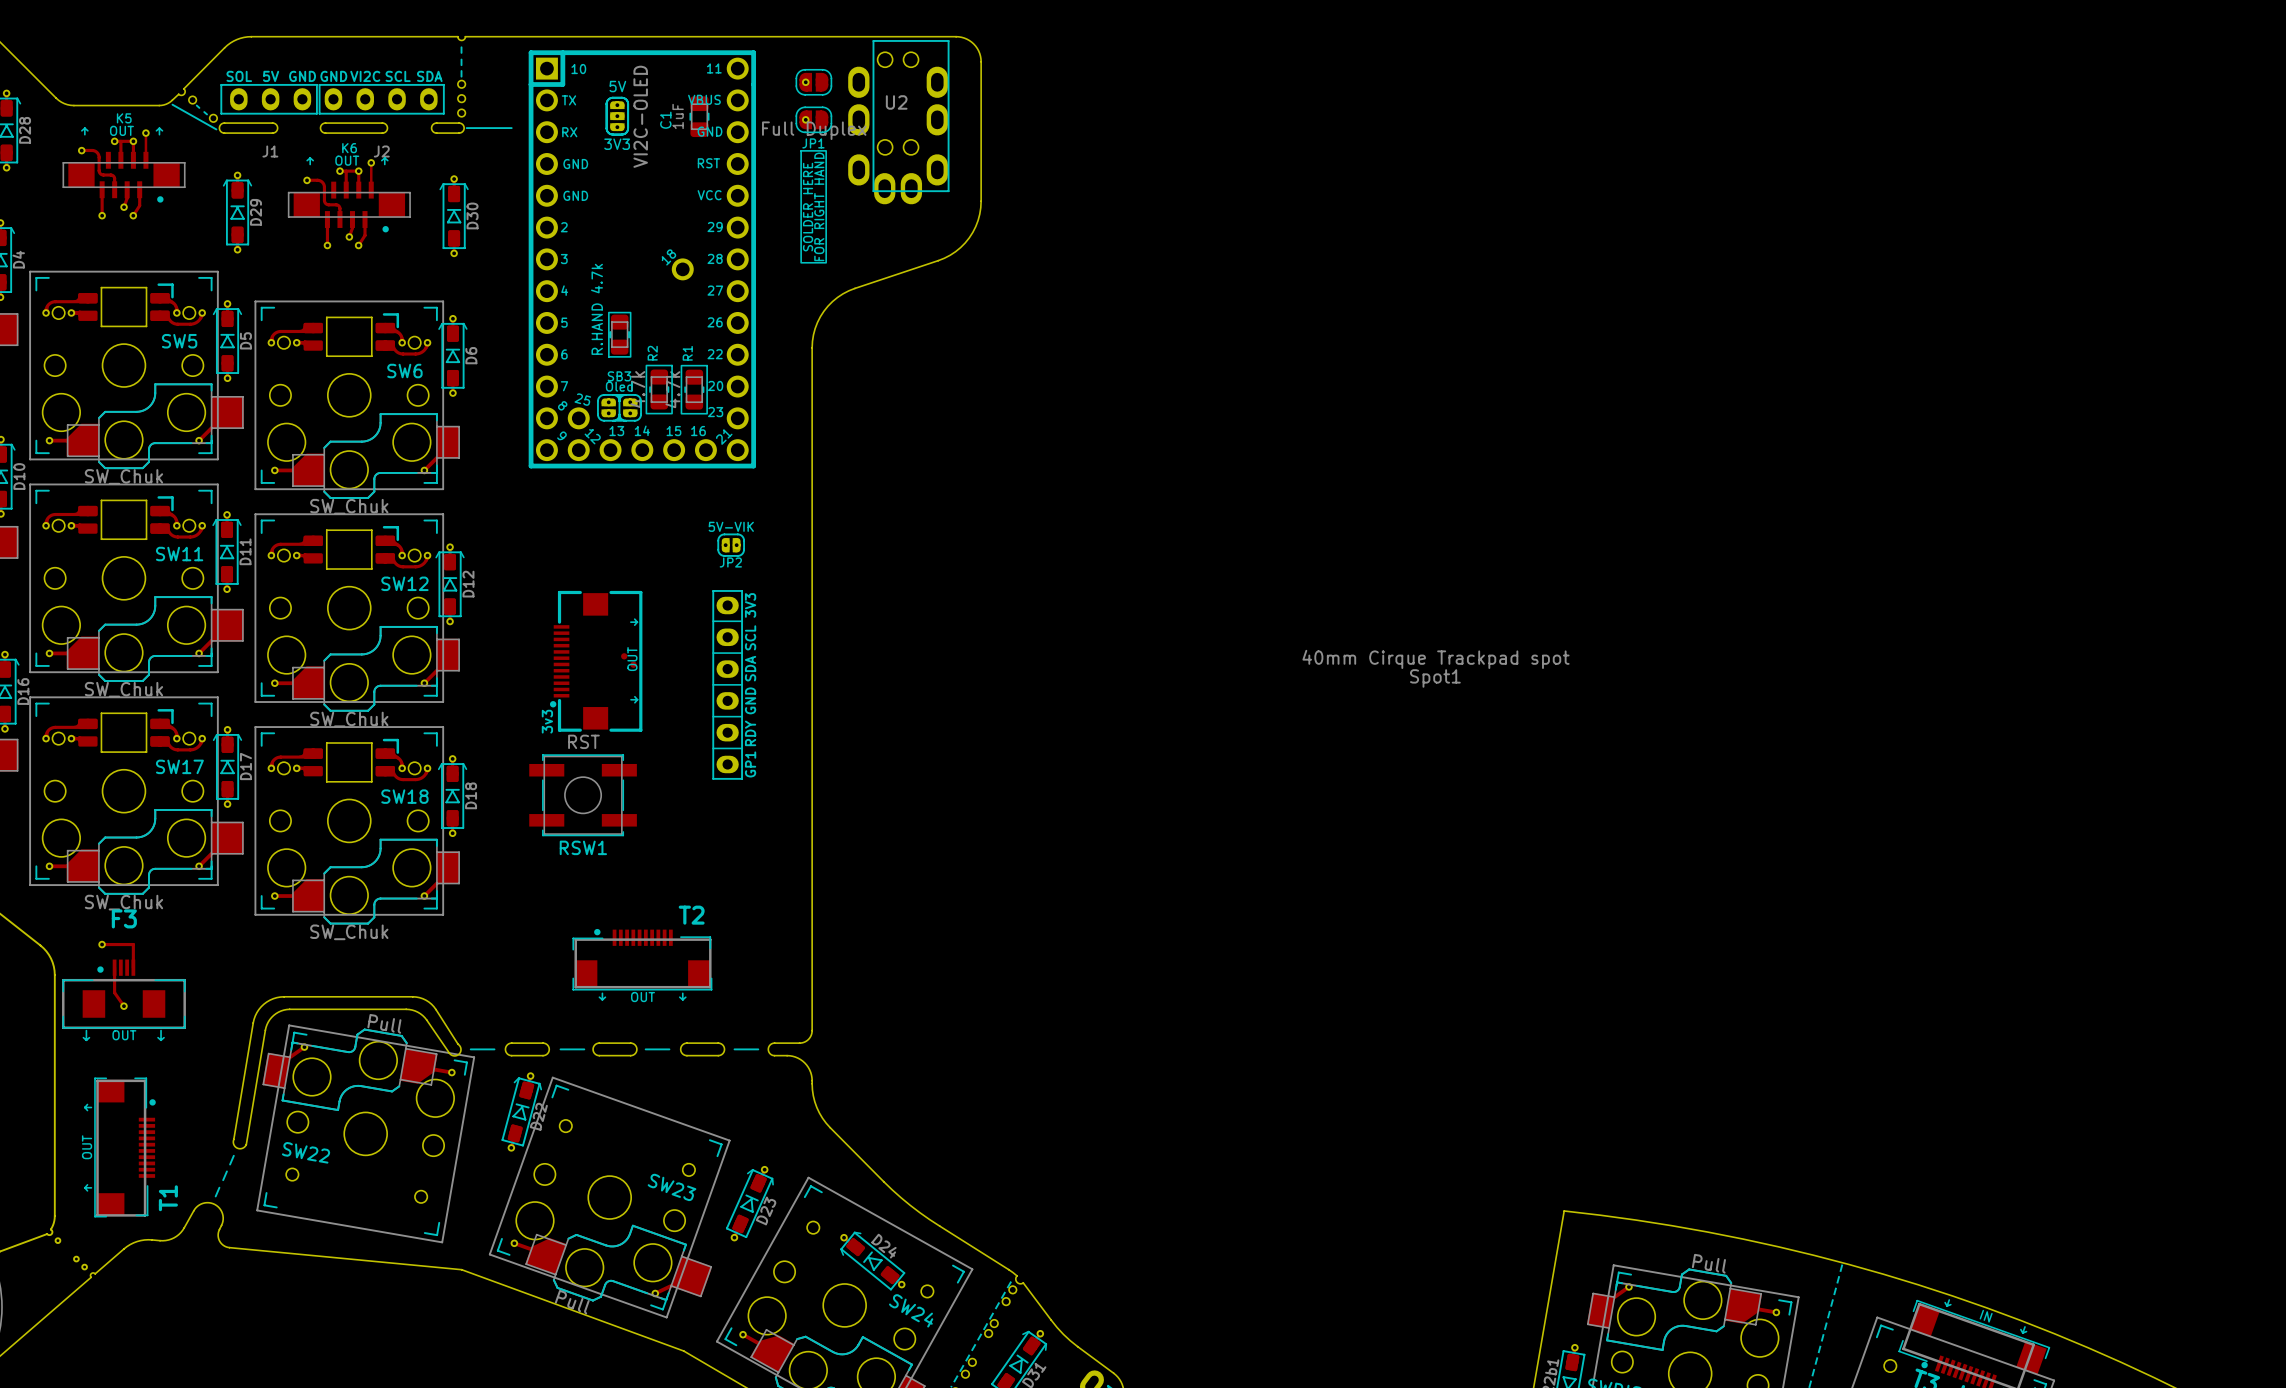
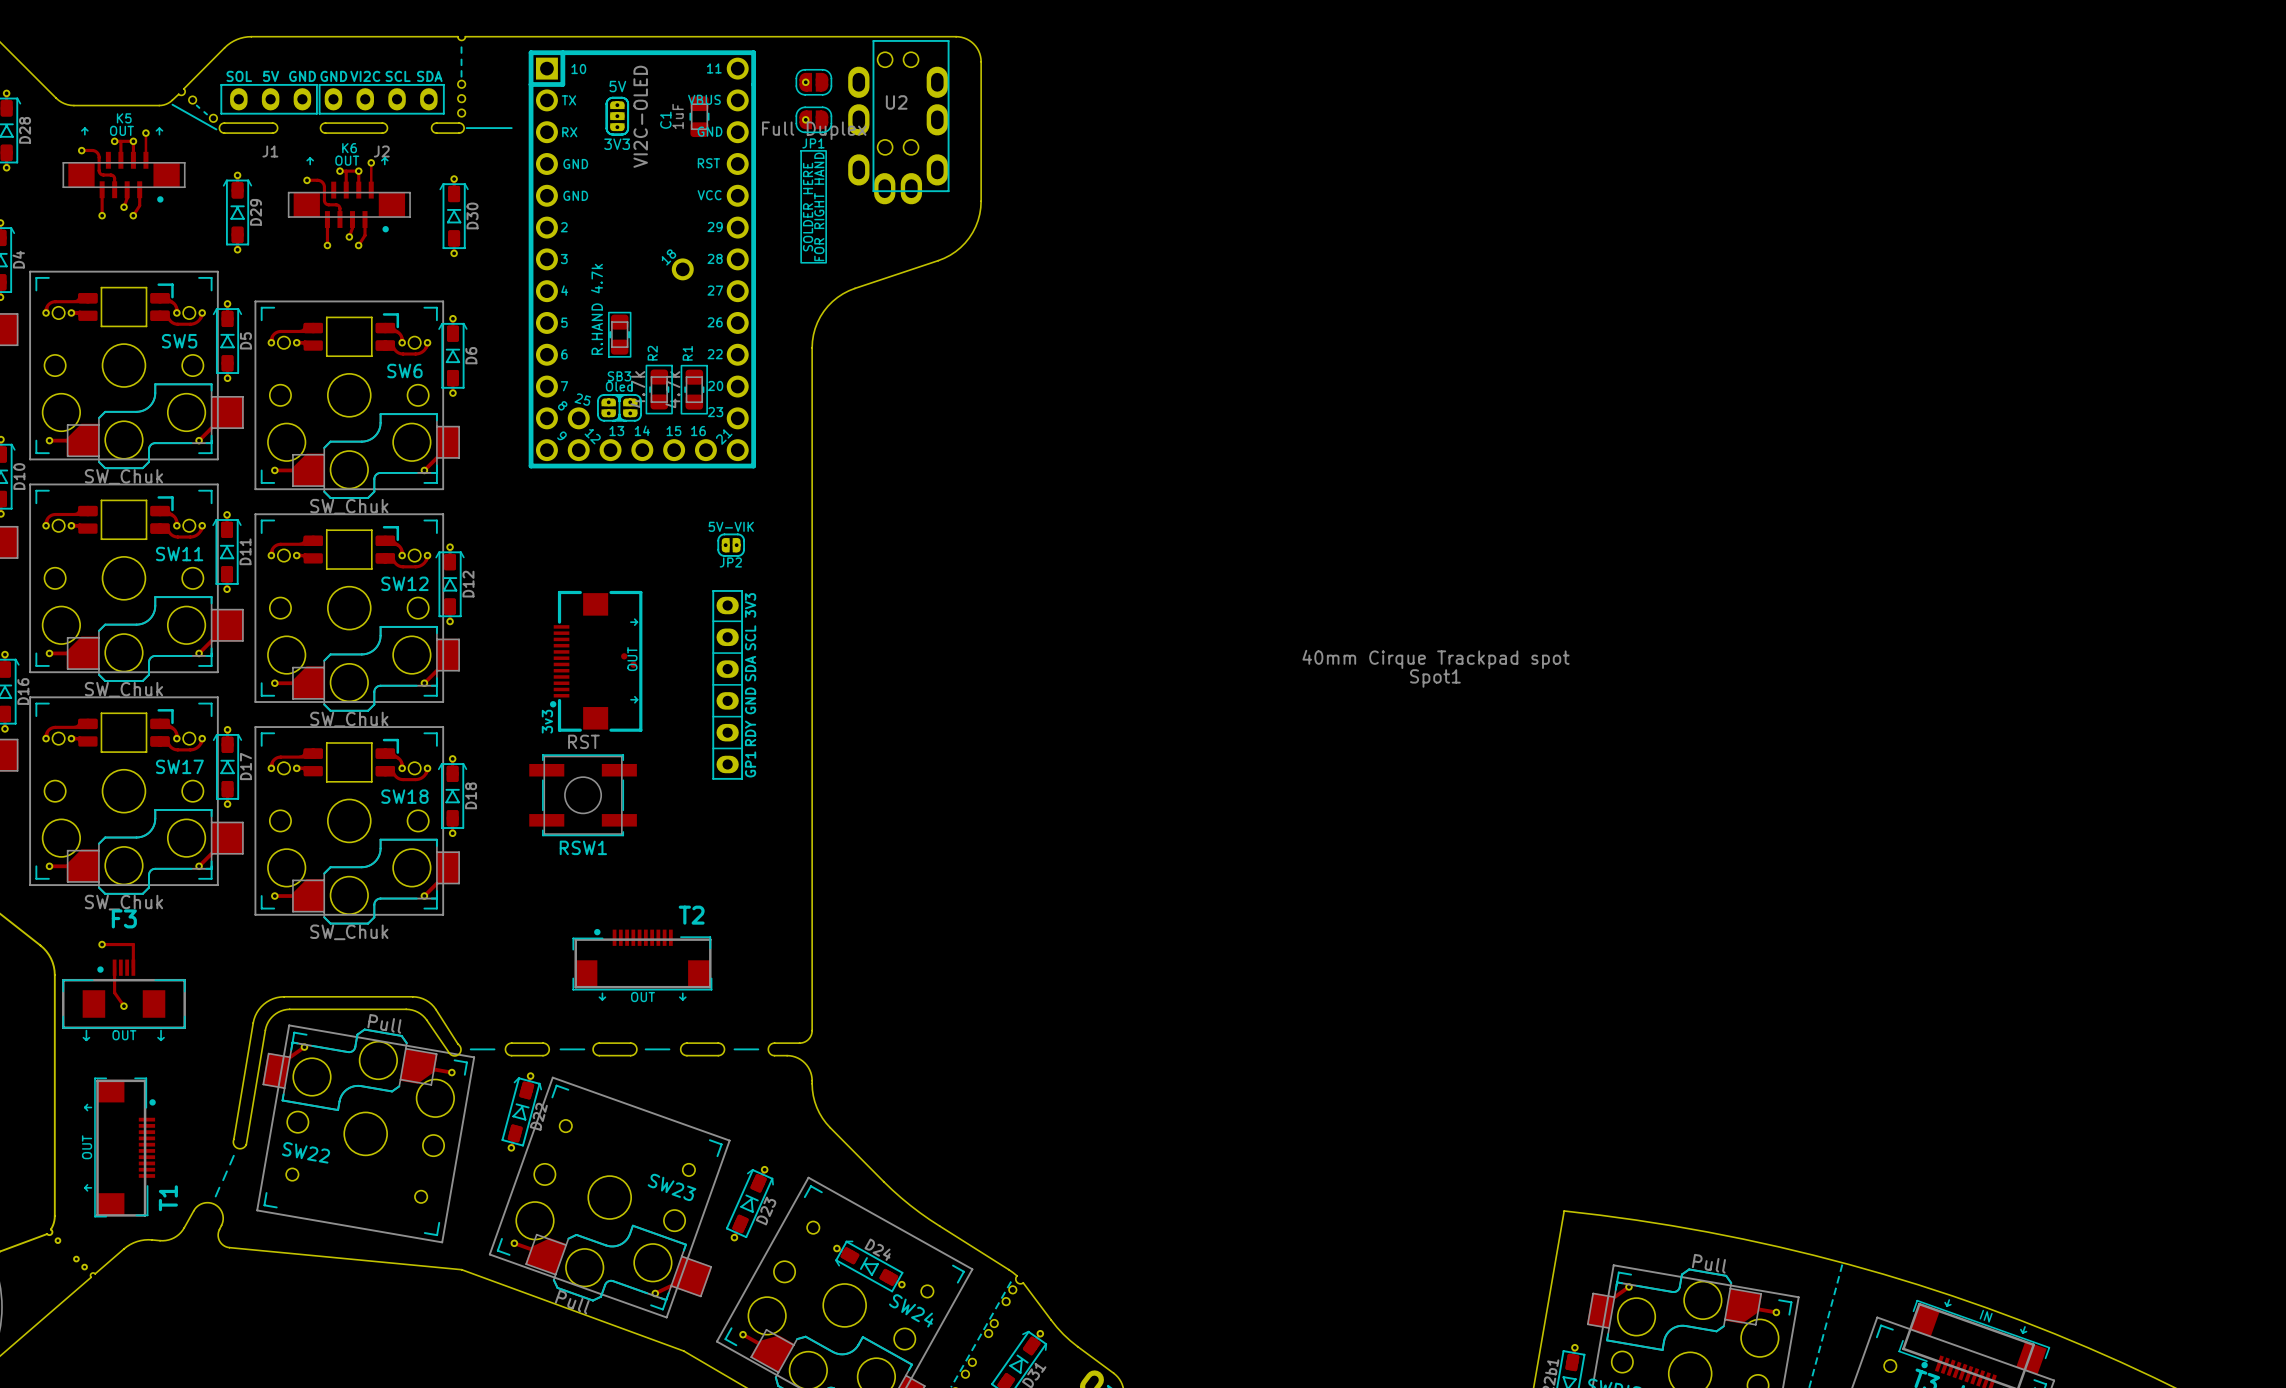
D24 rotation: 0° (872, 1261) -> 10° counterclockwise (869, 1266)

